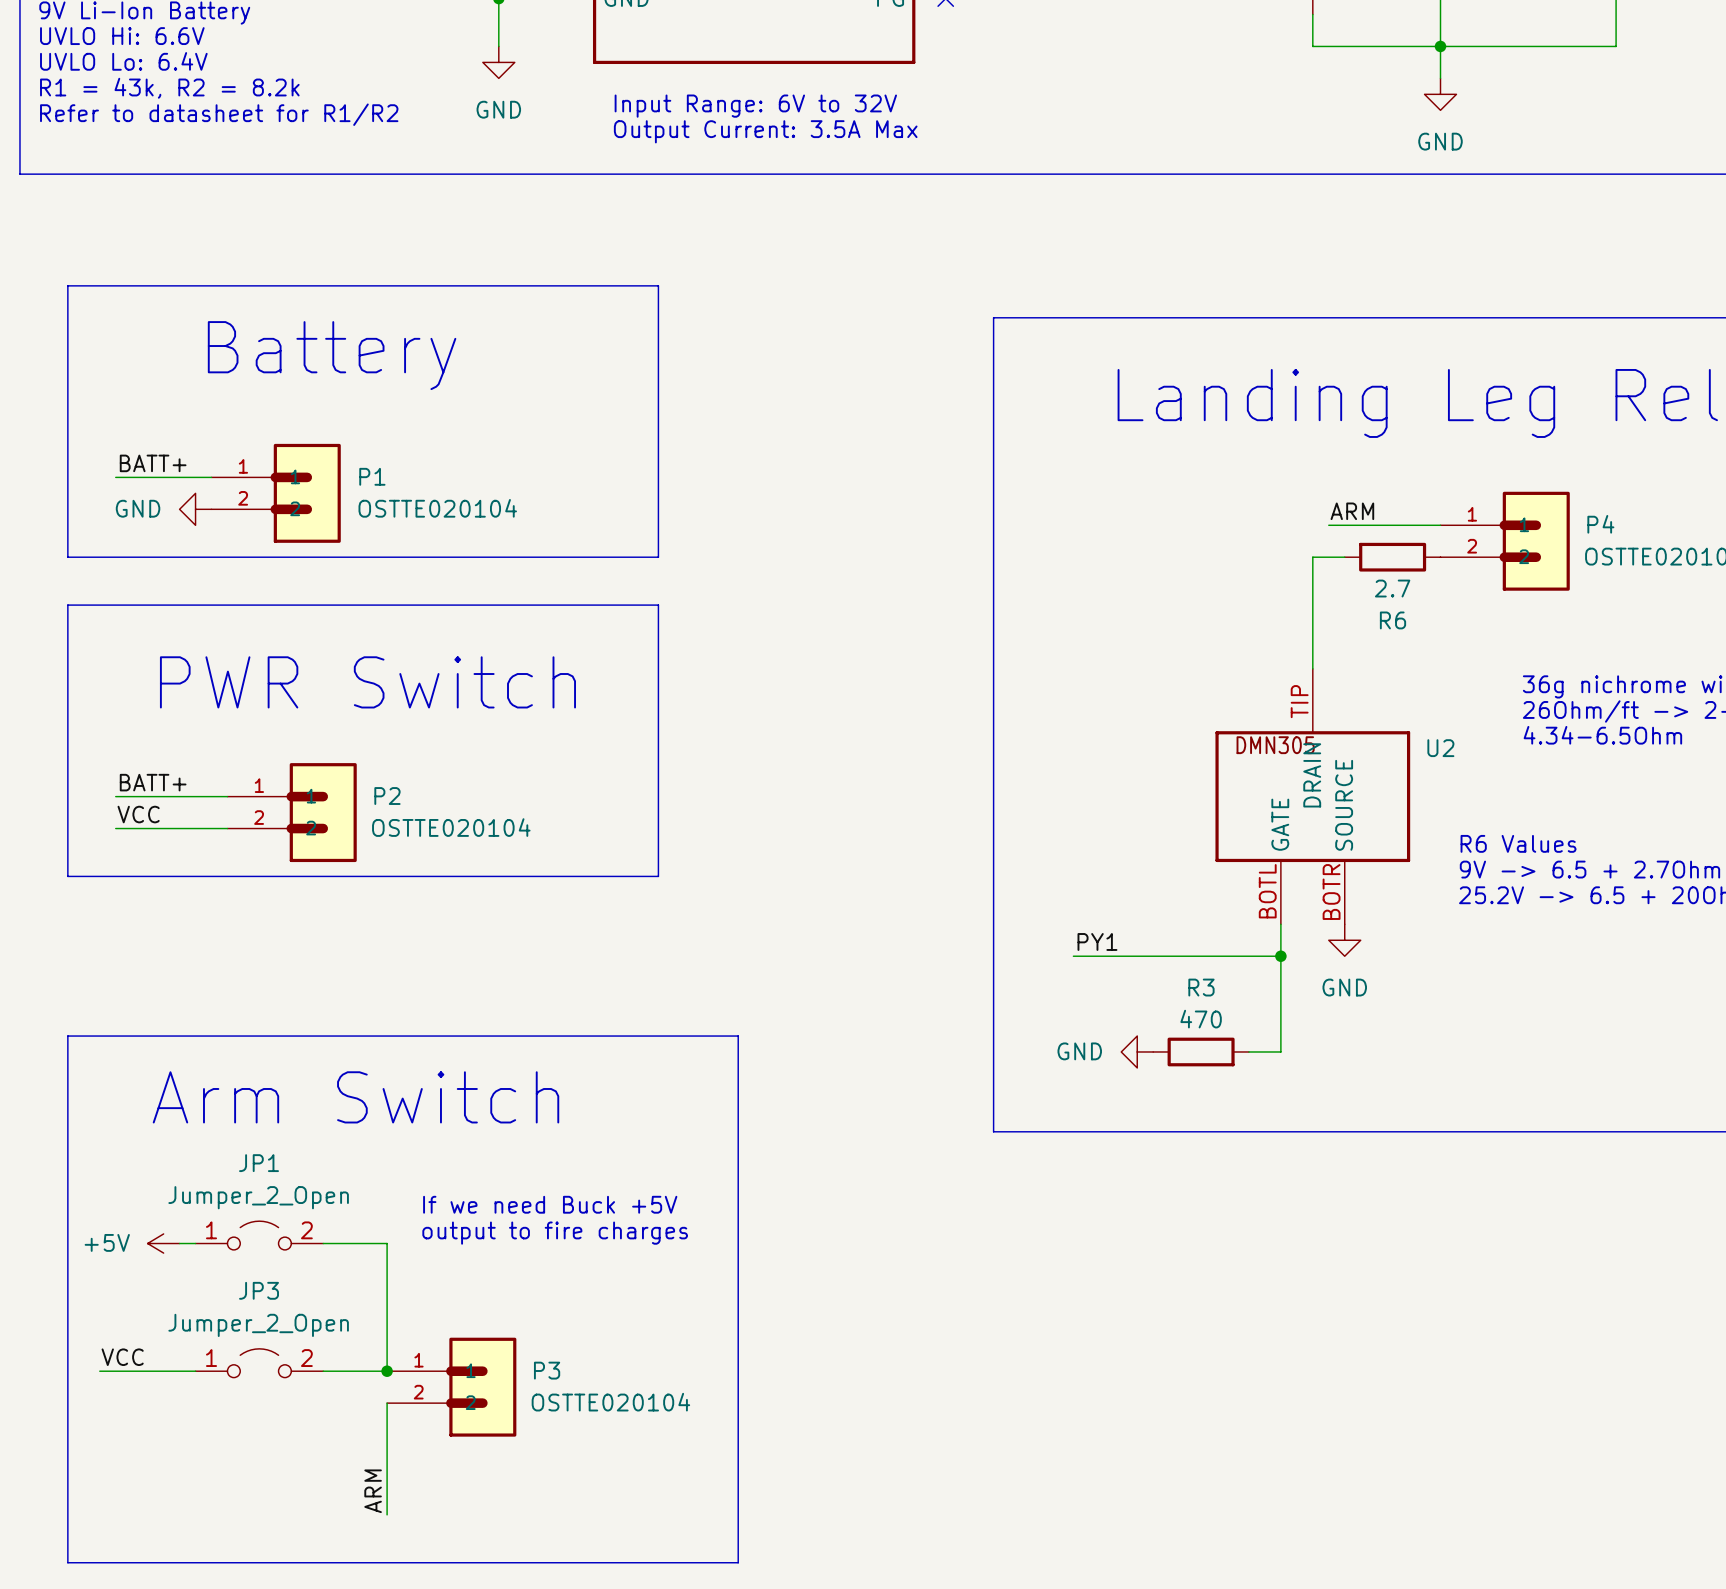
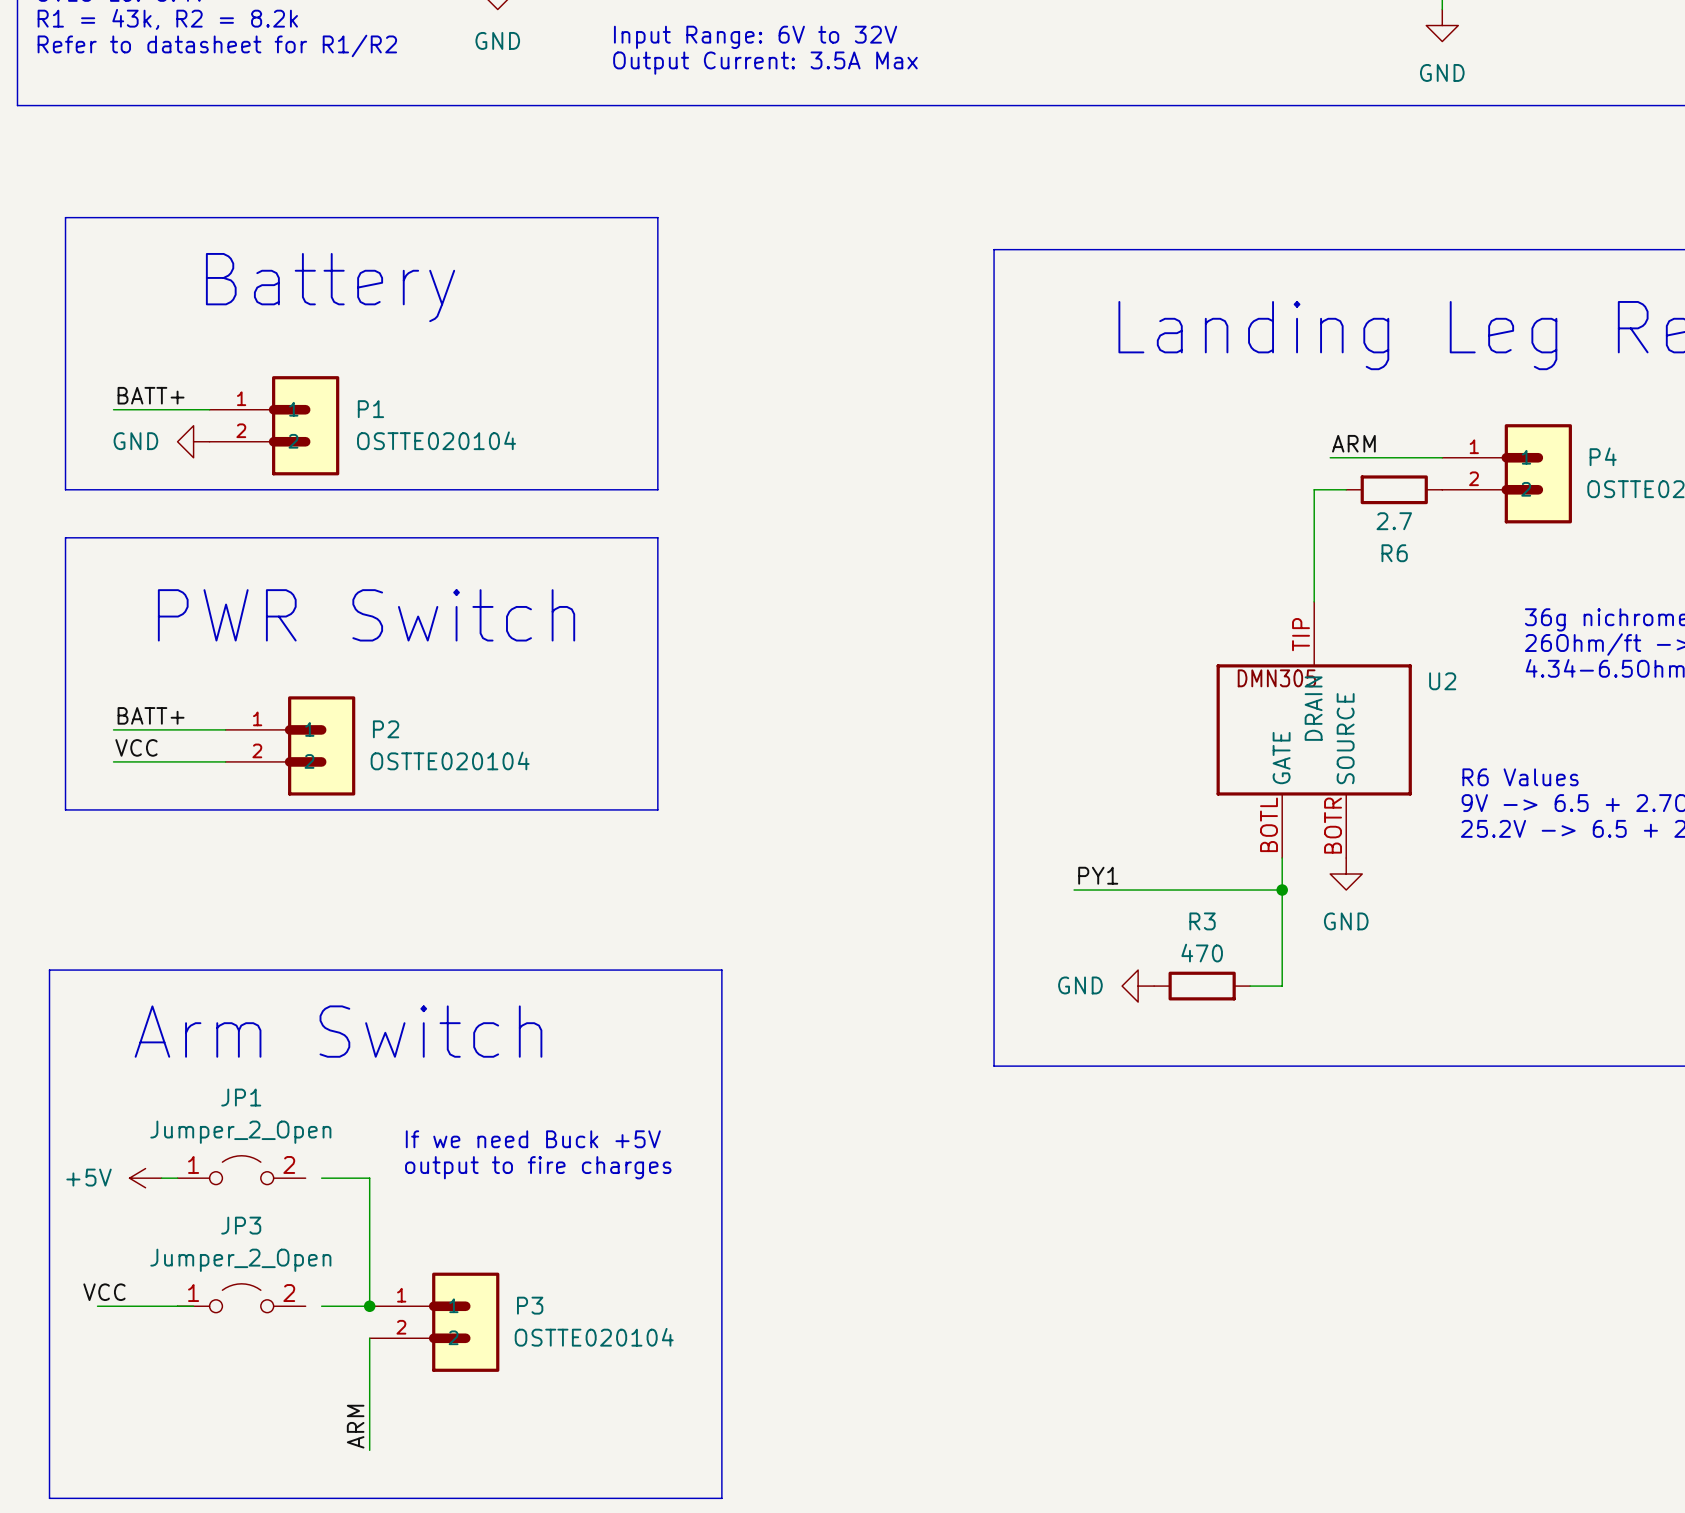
line: (67, 1036) (67, 1562) -> (65, 970) (49, 970) (49, 1498) (65, 1498)
line: (722, 1036) (738, 1036) (738, 1562) (722, 1562) -> (721, 970) (721, 1498)
text position: Arm Switch (355, 1097) -> Arm Switch (338, 1031)
text position: If we need Buck +5V (550, 1204) -> If we need Buck +5V (533, 1139)
text position: output to fire charges (555, 1233) -> output to fire charges (538, 1167)
JP1 position: (259, 1235) -> (241, 1170)
power symbol position: +5V (163, 1243) -> +5V (145, 1178)
wire: (371, 1243) (387, 1243) (387, 1371) (371, 1371) -> (369, 1178) (369, 1306)
label position: VCC (122, 1357) -> VCC (104, 1292)
JP3 position: (259, 1363) -> (241, 1298)
junction position: (387, 1371) -> (369, 1306)
P3 position: (451, 1387) -> (434, 1322)
wire: (387, 1403) (387, 1514) -> (369, 1338) (369, 1450)
label position: ARM (373, 1491) -> ARM (355, 1426)

